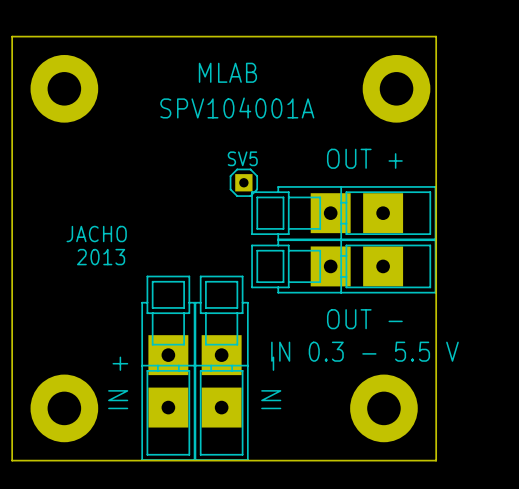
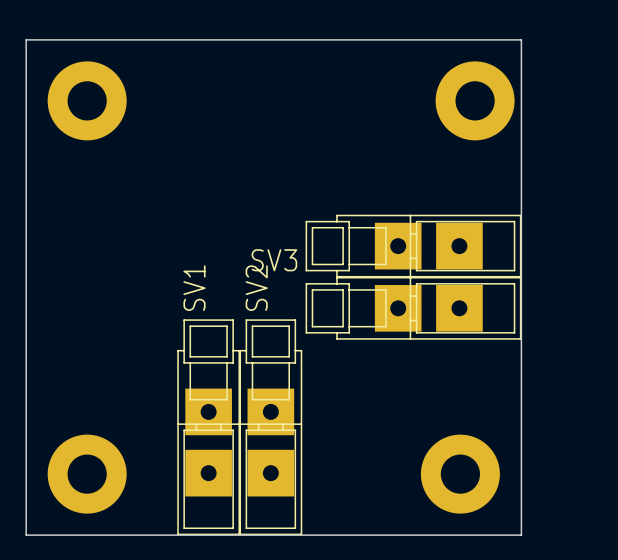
text: MLAB (227, 72) -> none
text: SPV104001A (237, 107) -> none
text: OUT + (364, 158) -> none
SV5: (243, 182) -> none
SV3 name: none -> SV3 (274, 260)
text: JACHO (96, 234) -> none
SV1 name: none -> SV1 (194, 288)
SV2 name: none -> SV2 (256, 288)
text: 2013 (101, 257) -> none
text: OUT - (364, 319) -> none
text: IN 0.3 - 5.5 V (364, 351) -> none
text: IN + (118, 382) -> none
text: IN - (271, 382) -> none

